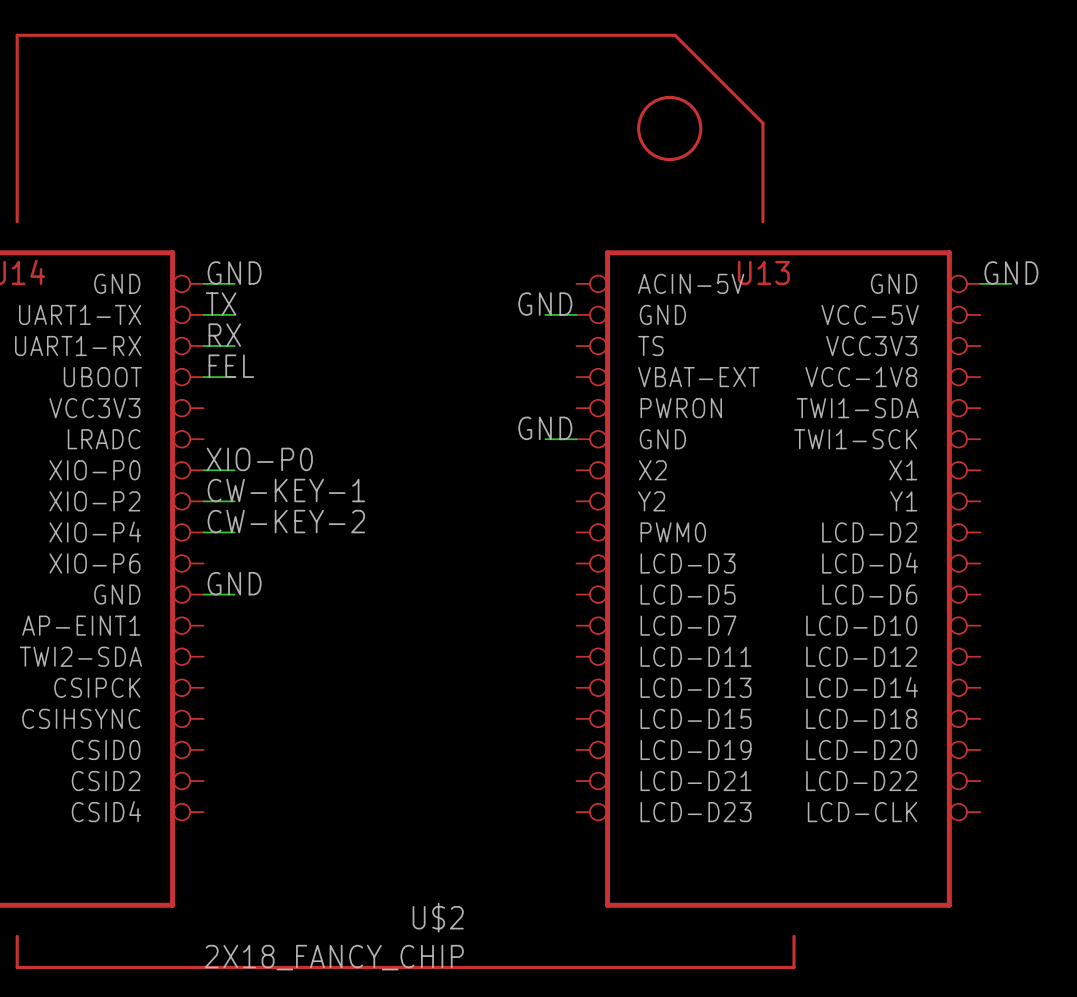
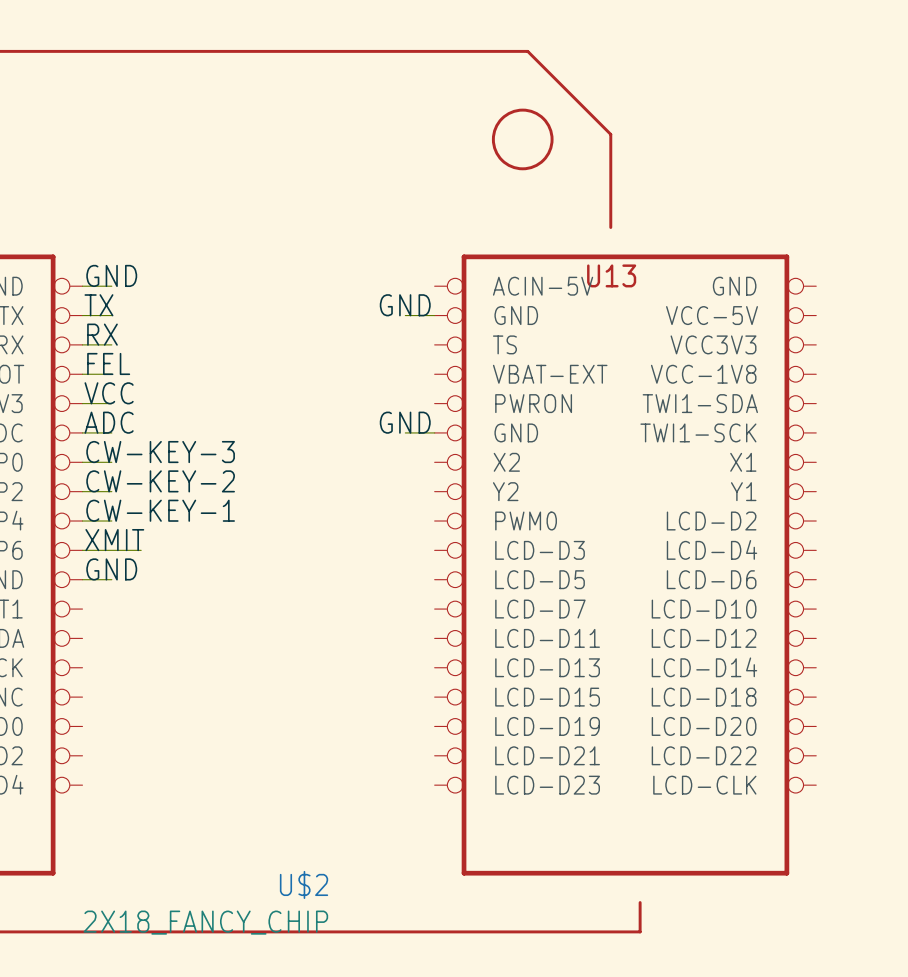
label: GND (1011, 272) -> none
wire: (980, 283) (1011, 283) -> none
label: none -> VCC (109, 393)
wire: none -> (82, 403) (111, 403)
label: none -> ADC (109, 422)
wire: none -> (82, 432) (111, 432)
label: XIO-P0 (259, 459) -> CW-KEY-3 (160, 452)
label: CW-KEY-1 (286, 490) -> CW-KEY-2 (160, 481)
label: CW-KEY-2 (286, 521) -> CW-KEY-1 (160, 510)
label: none -> XMIT (114, 540)
wire: none -> (82, 550) (141, 550)

